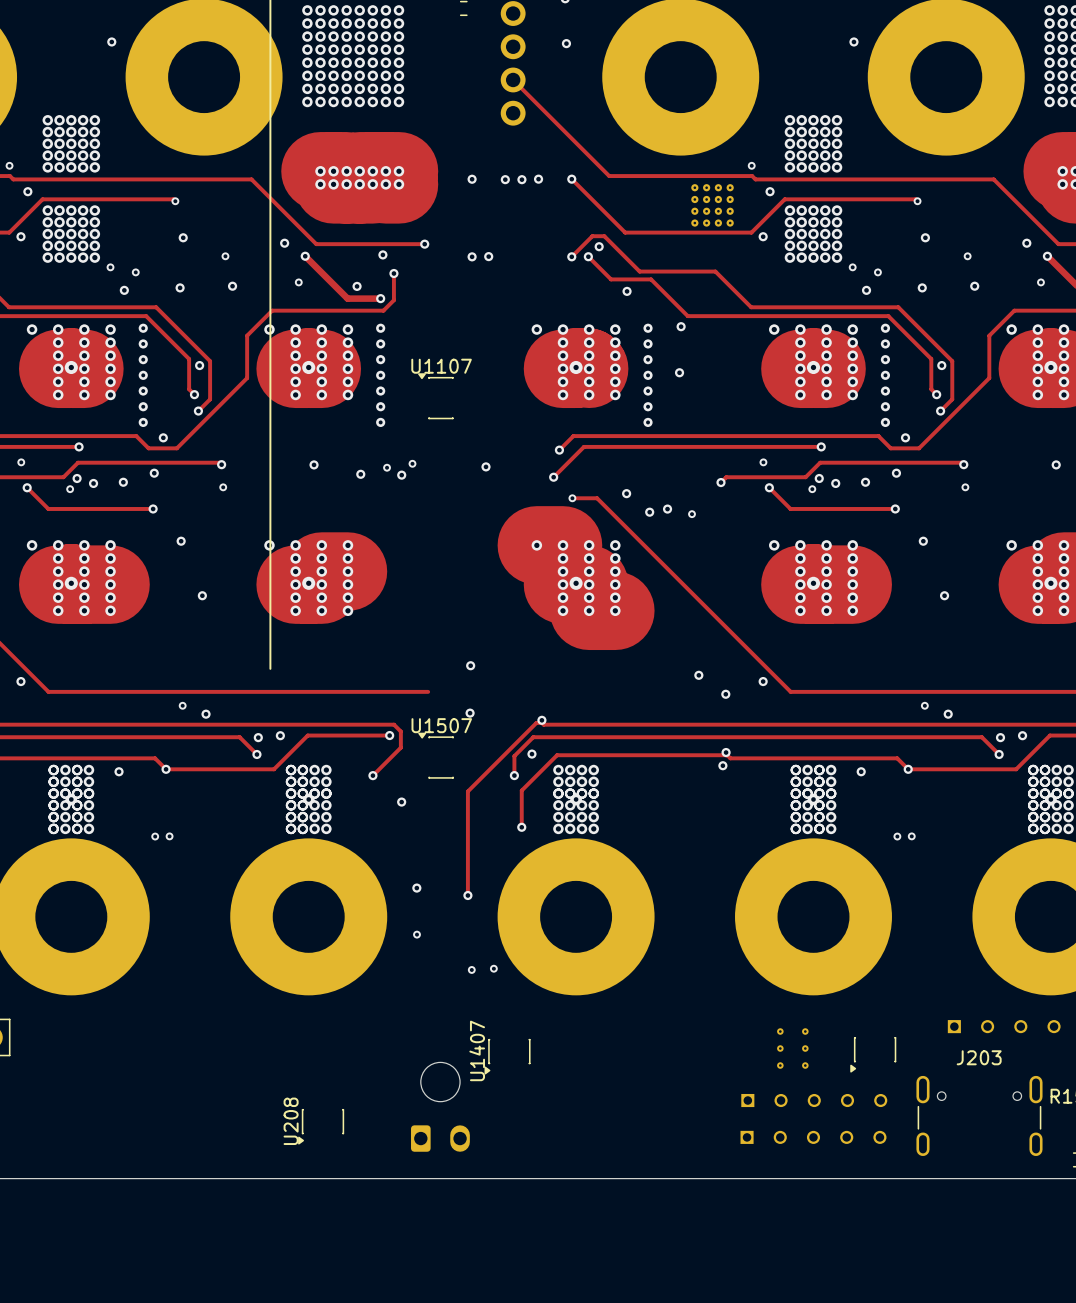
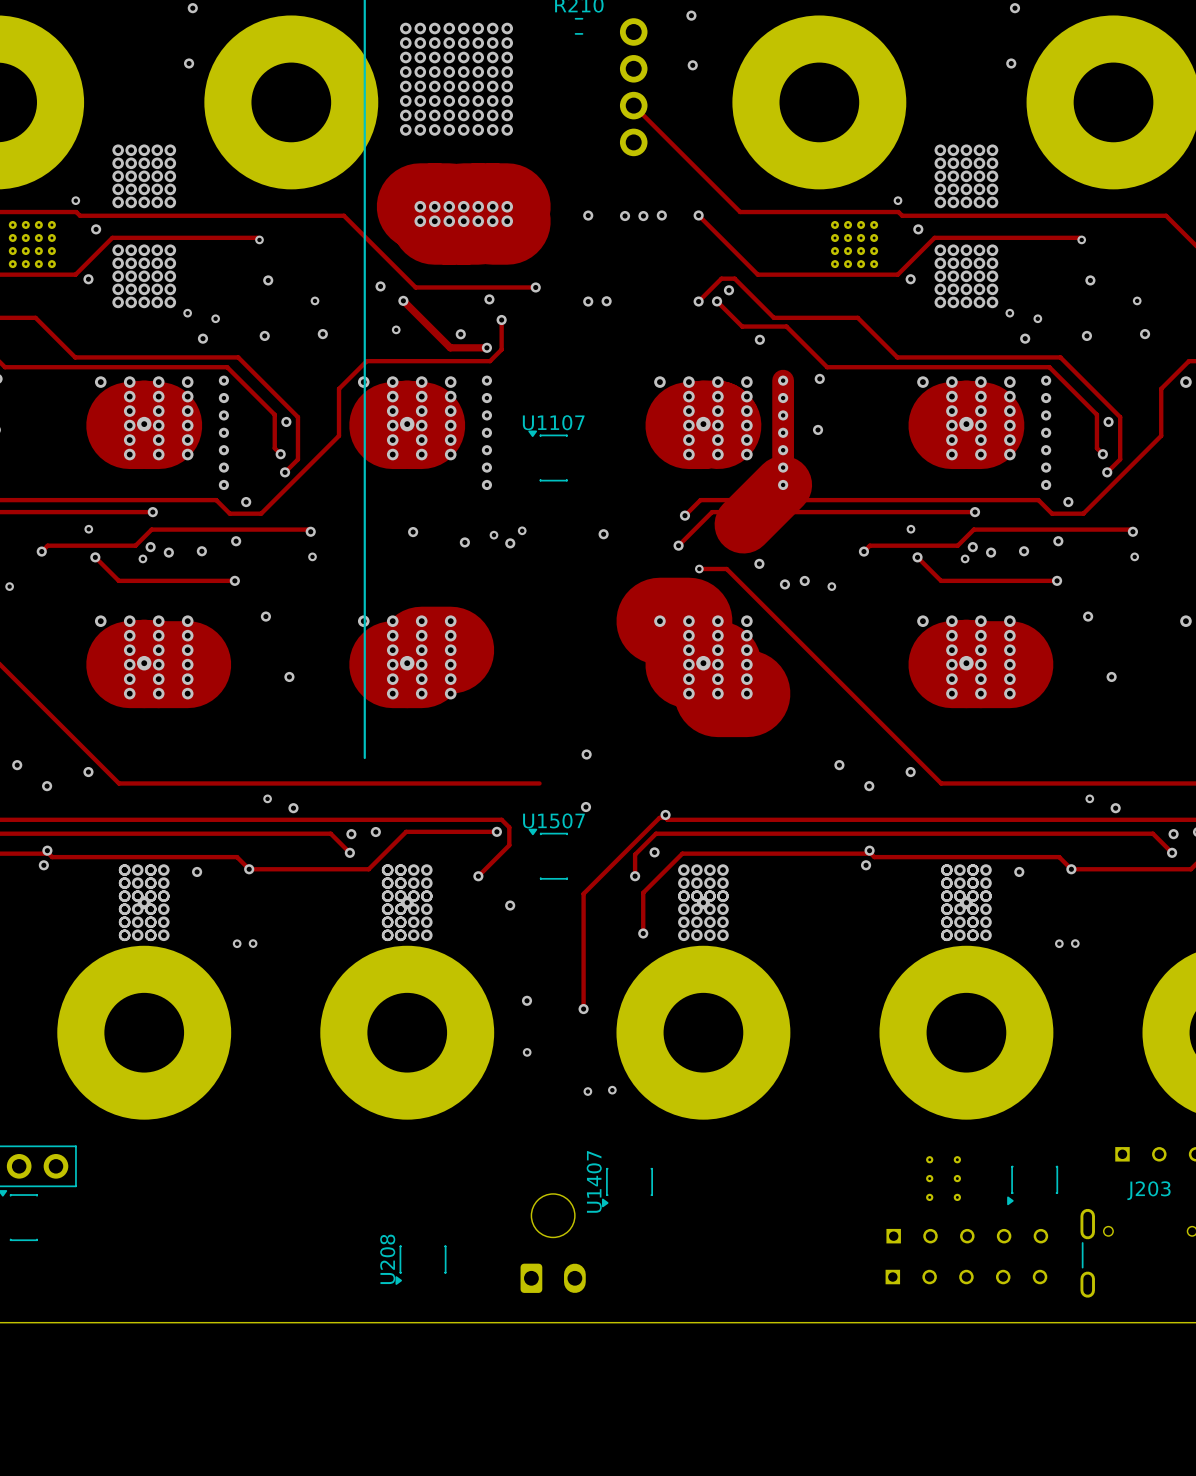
track: none -> (783, 380) (783, 484) (743, 524)

